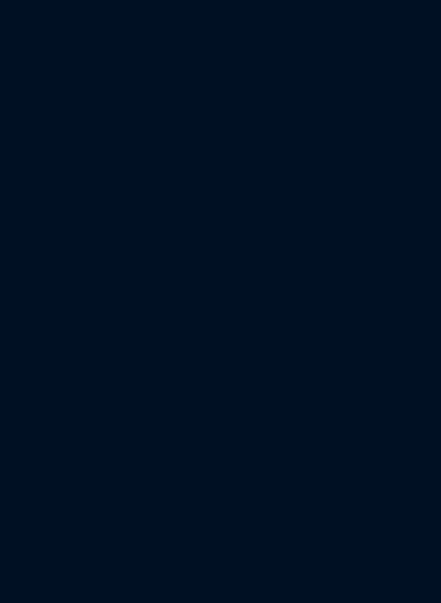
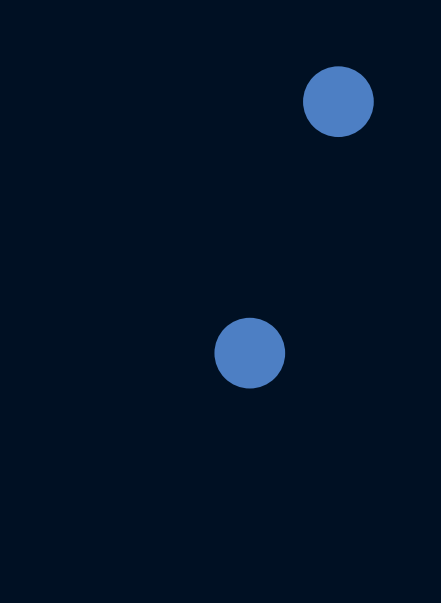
part: none -> (338, 101)
part: none -> (249, 353)

